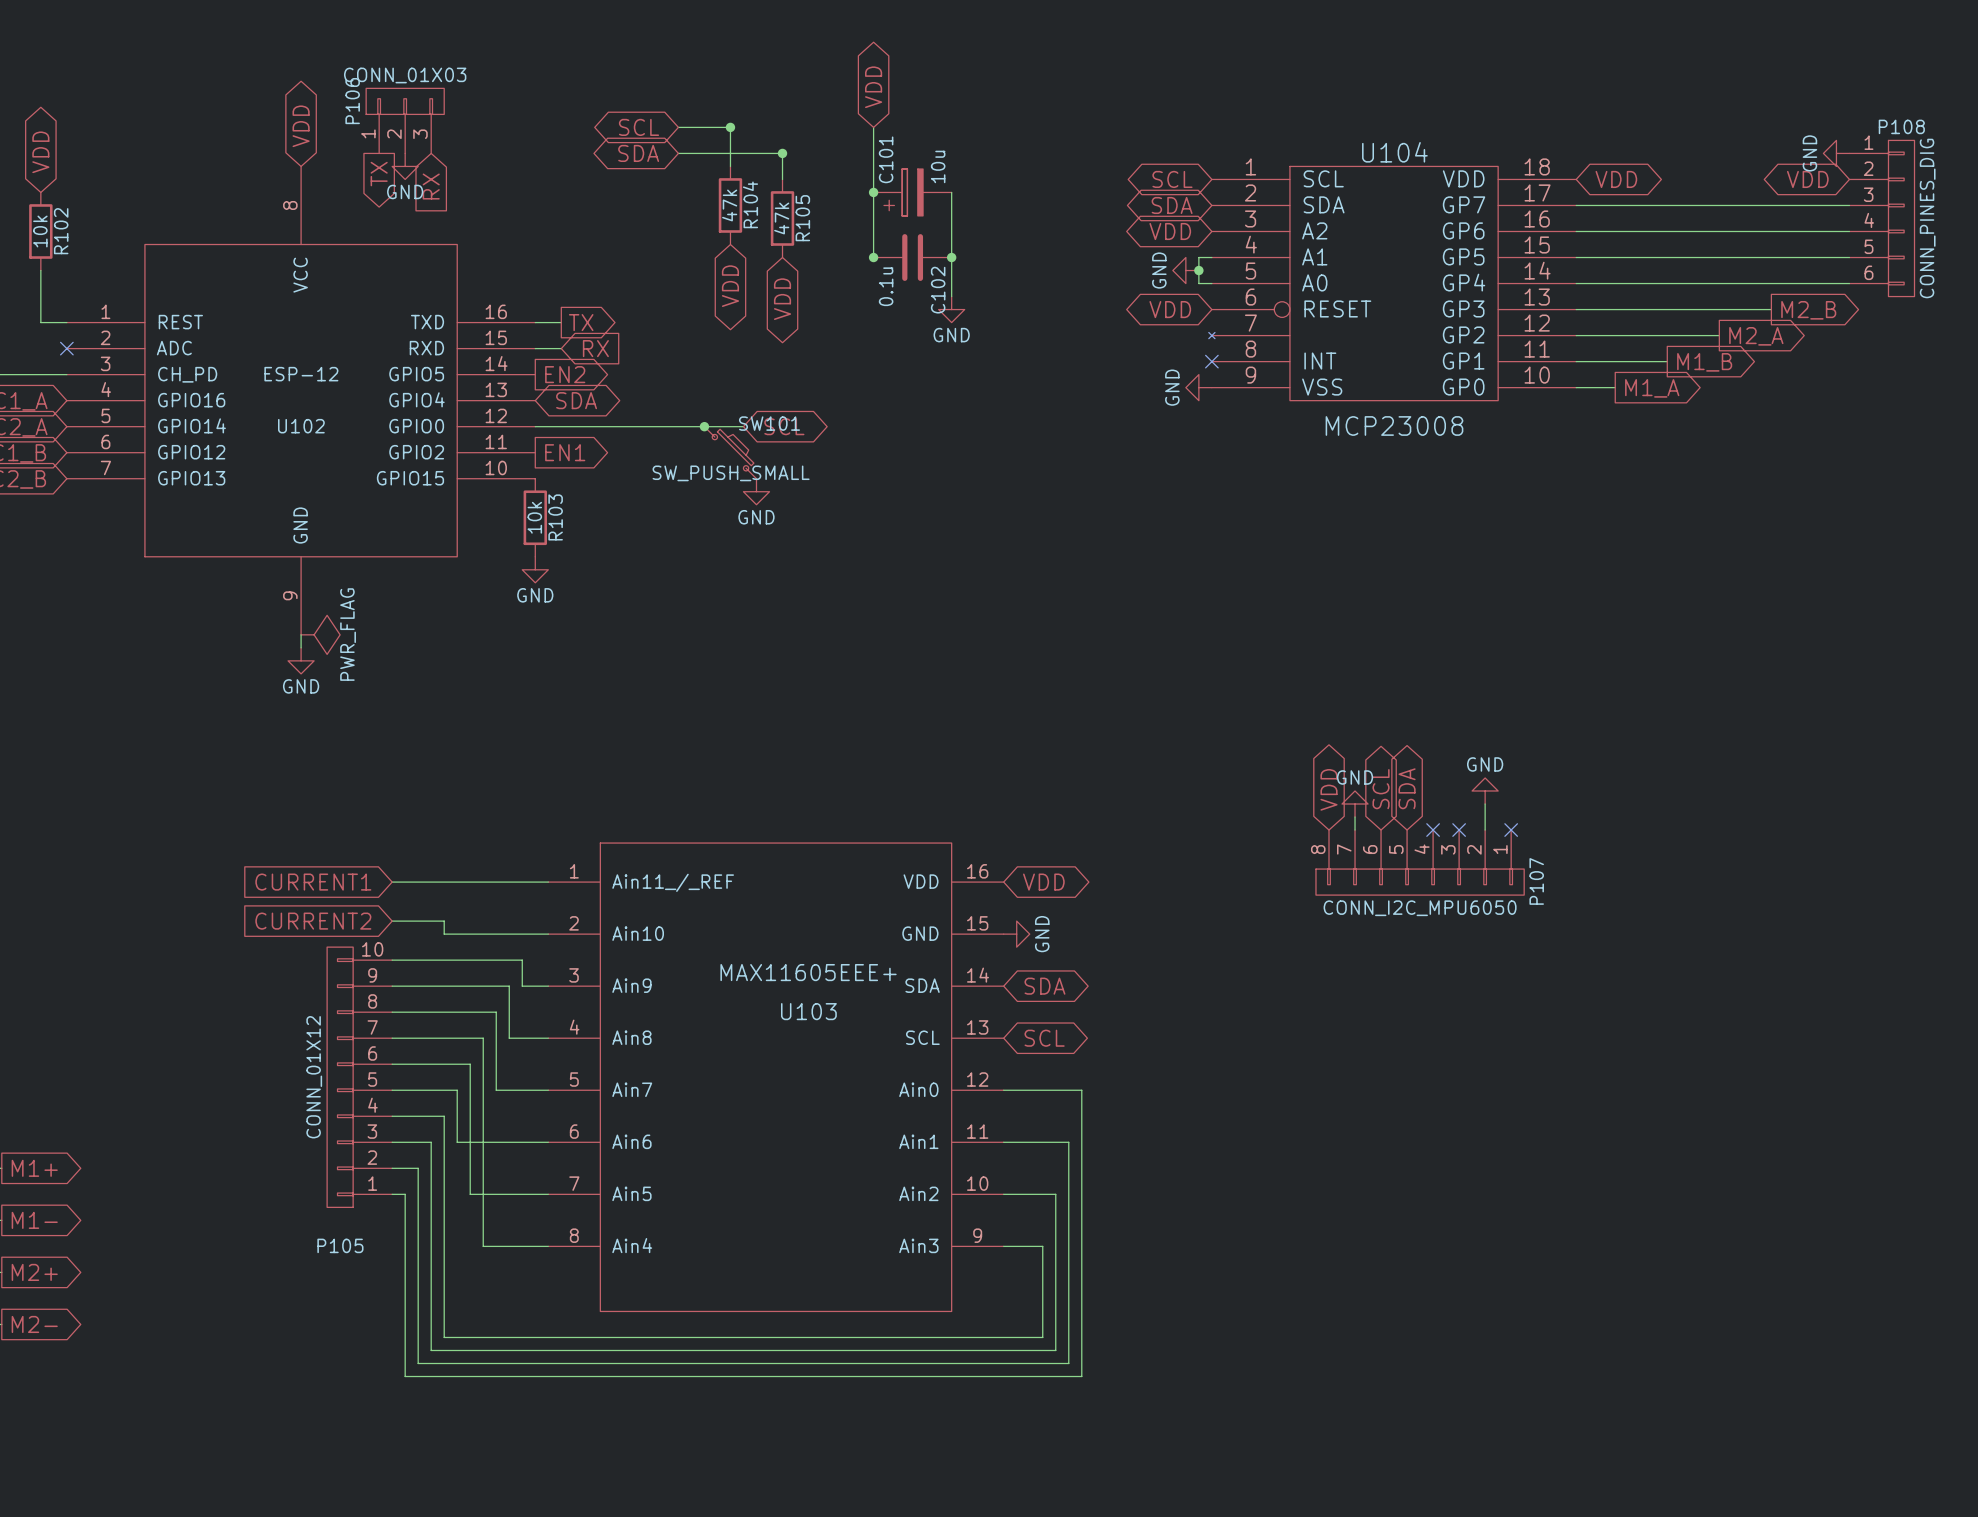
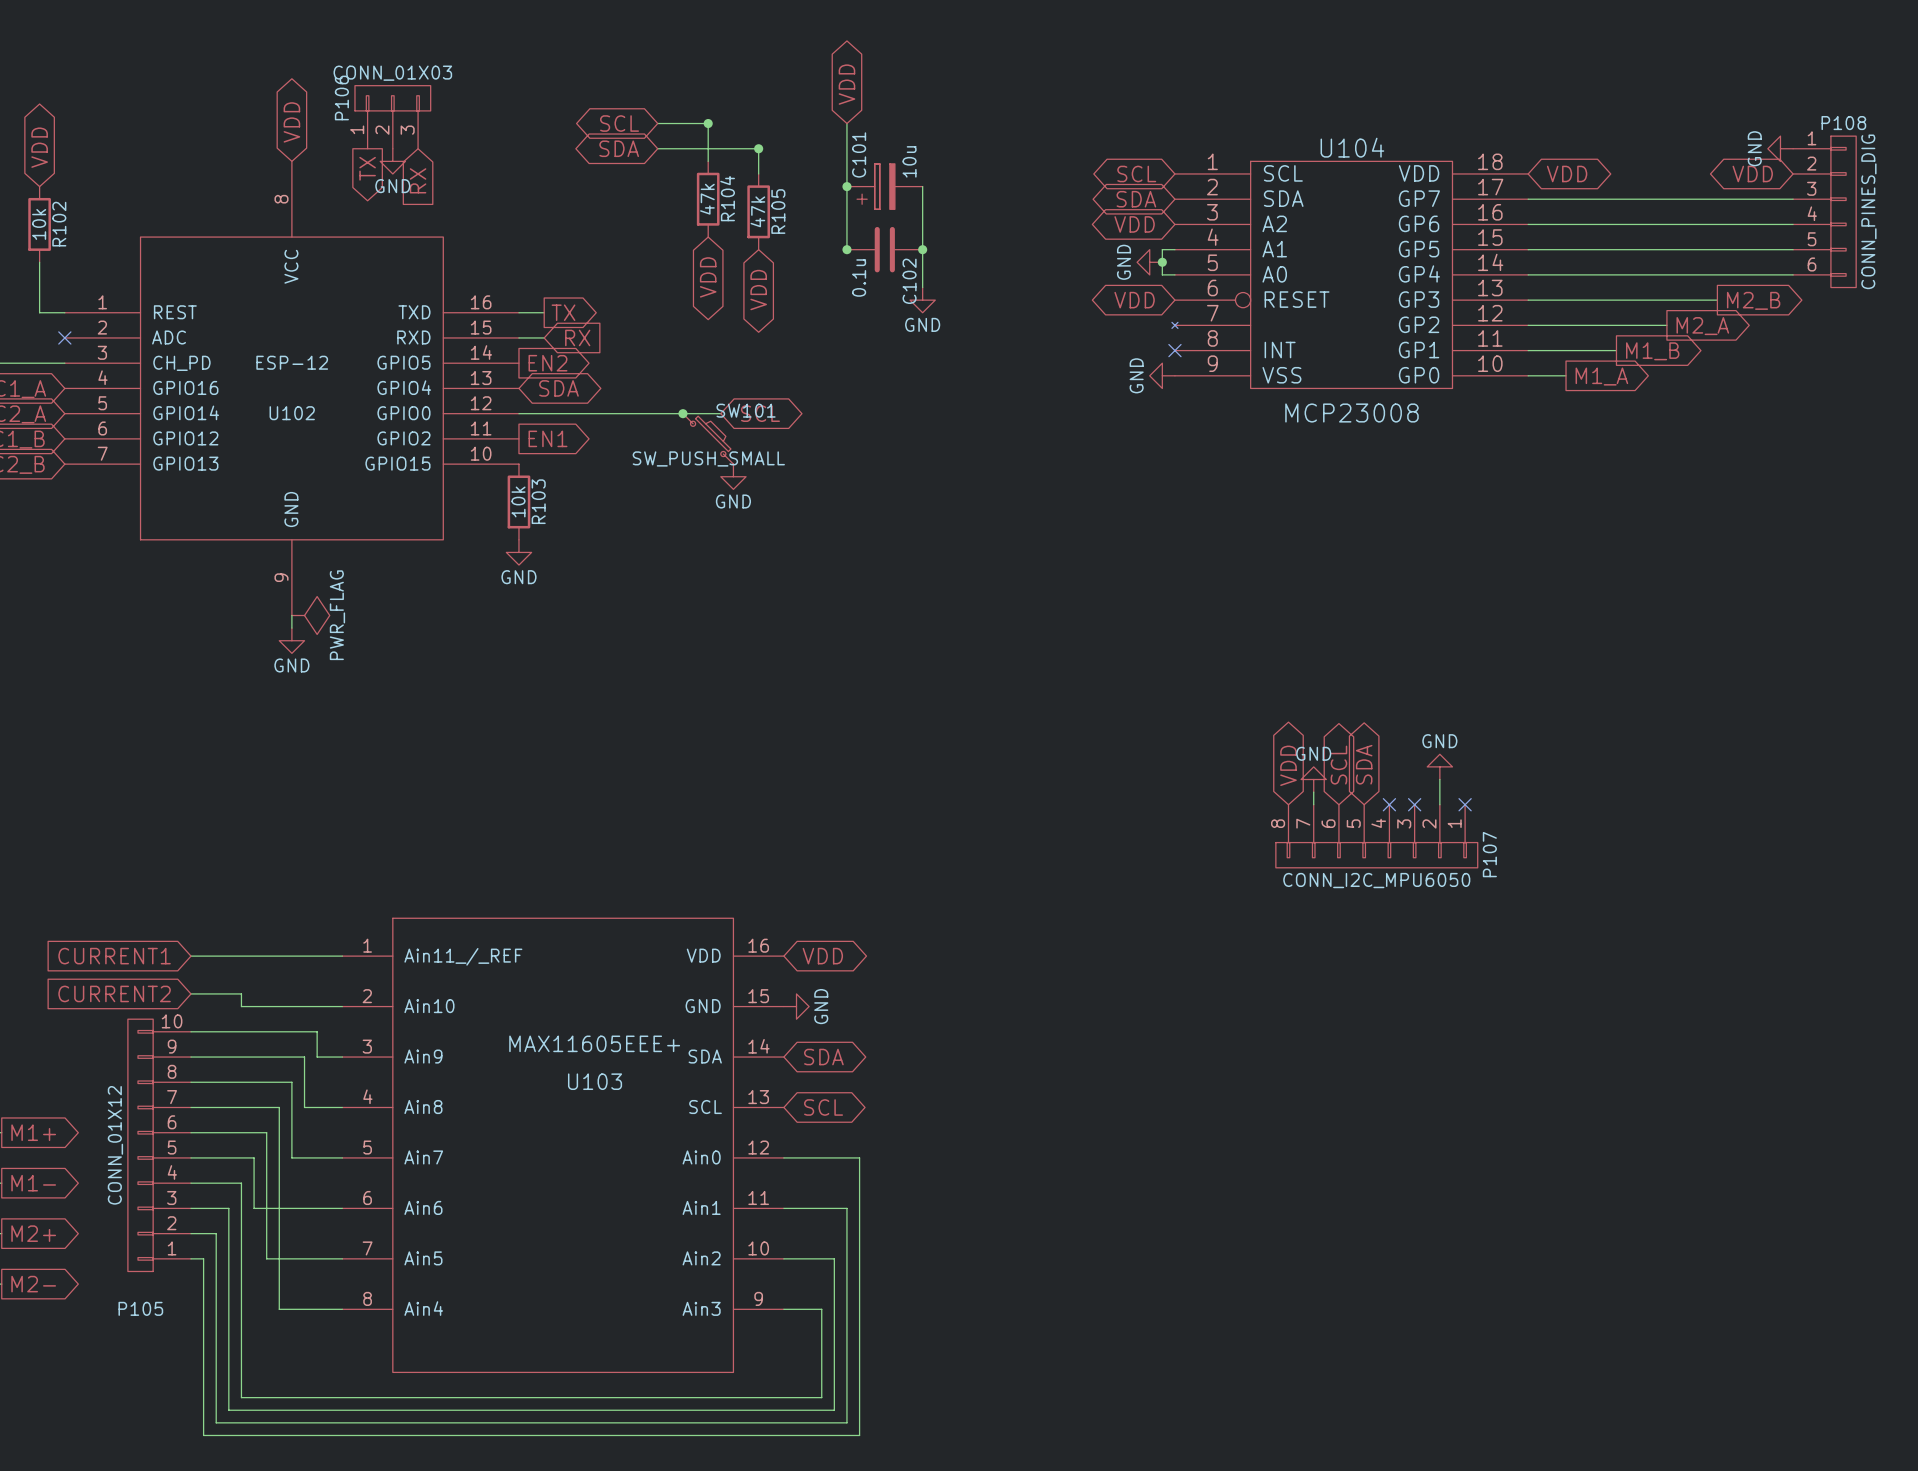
global label position: CURRENT1 (313, 882) -> CURRENT1 (114, 956)
wire: (392, 882) (548, 882) -> (190, 956) (342, 956)
global label position: VDD (1043, 882) -> VDD (822, 956)
global label position: CURRENT2 (313, 921) -> CURRENT2 (114, 993)
wire: (392, 921) (444, 921) (444, 934) (548, 934) -> (190, 993) (241, 993) (241, 1006) (342, 1006)
power symbol position: GND (1016, 934) -> GND (796, 1006)
wire: (392, 960) (522, 960) (522, 986) (548, 986) -> (190, 1031) (317, 1031) (317, 1057) (342, 1057)
wire: (392, 986) (509, 986) (509, 1038) (548, 1038) -> (190, 1057) (304, 1057) (304, 1107) (342, 1107)
global label position: SDA (1044, 986) -> SDA (823, 1057)
wire: (392, 1012) (496, 1012) (496, 1090) (548, 1090) -> (190, 1082) (291, 1082) (291, 1157) (342, 1157)
wire: (392, 1038) (483, 1038) (483, 1246) (548, 1246) -> (190, 1107) (279, 1107) (279, 1309) (342, 1309)
global label position: SCL (1044, 1038) -> SCL (823, 1107)
wire: (392, 1064) (470, 1064) (470, 1194) (548, 1194) -> (190, 1132) (266, 1132) (266, 1258) (342, 1258)
P105 position: (359, 1077) -> (159, 1145)
U103 position: (776, 1077) -> (563, 1145)
wire: (392, 1090) (457, 1090) (457, 1142) (548, 1142) -> (190, 1157) (254, 1157) (254, 1208) (342, 1208)
wire: (1003, 1090) (1081, 1090) (1081, 1376) (405, 1376) (405, 1194) (392, 1194) -> (783, 1157) (859, 1157) (859, 1435) (203, 1435) (203, 1258) (190, 1258)
wire: (392, 1116) (444, 1116) (444, 1337) (1042, 1337) (1042, 1246) (1003, 1246) -> none
wire: (392, 1142) (431, 1142) (431, 1350) (808, 1350) -> none
wire: (1003, 1142) (1068, 1142) (1068, 1363) (418, 1363) (418, 1168) (392, 1168) -> (783, 1208) (846, 1208) (846, 1422) (216, 1422) (216, 1233) (190, 1233)
wire: (1003, 1194) (1055, 1194) (1055, 1350) (847, 1350) -> (190, 1183) (241, 1183) (241, 1397) (821, 1397) (821, 1309)
wire: none -> (190, 1208) (228, 1208) (228, 1410) (834, 1410) (834, 1258) (783, 1258)

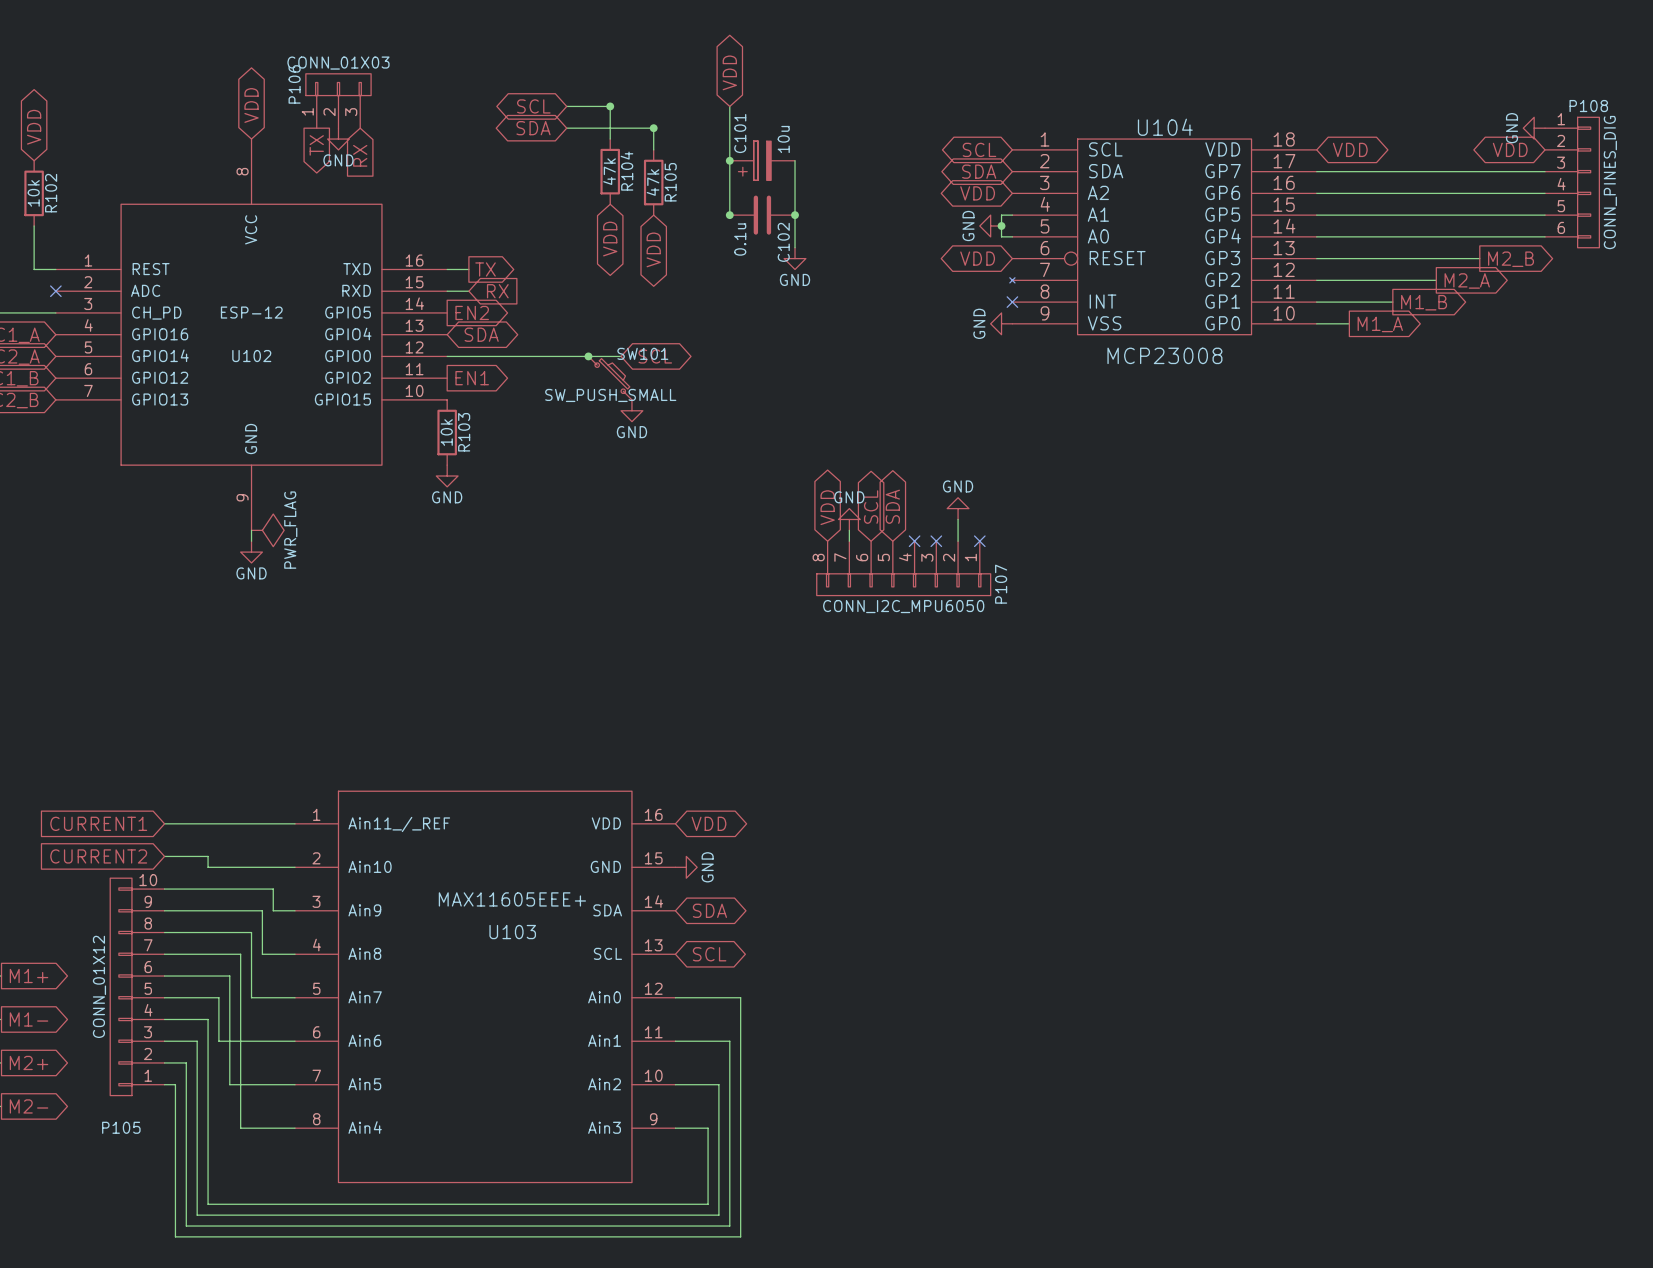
global label: none -> SCL (871, 507)
global label: none -> SDA (892, 506)
global label: none -> VDD (827, 507)
power symbol: none -> GND (958, 508)
power symbol: none -> GND (849, 519)
wire: none -> (958, 519) (958, 541)
wire: none -> (849, 530) (849, 541)
no-connect mark: none -> (914, 541)
no-connect mark: none -> (936, 541)
no-connect mark: none -> (979, 541)
global label: SDA (1364, 764) -> none
global label: VDD (1288, 765) -> none
global label: SCL (1338, 765) -> none
power symbol: GND (1439, 766) -> none
power symbol: GND (1313, 779) -> none
wire: (1439, 779) (1439, 804) -> none
wire: (1313, 792) (1313, 804) -> none
no-connect mark: (1389, 804) -> none
no-connect mark: (1414, 804) -> none
no-connect mark: (1465, 804) -> none
P107 position: (1376, 836) -> (903, 568)

